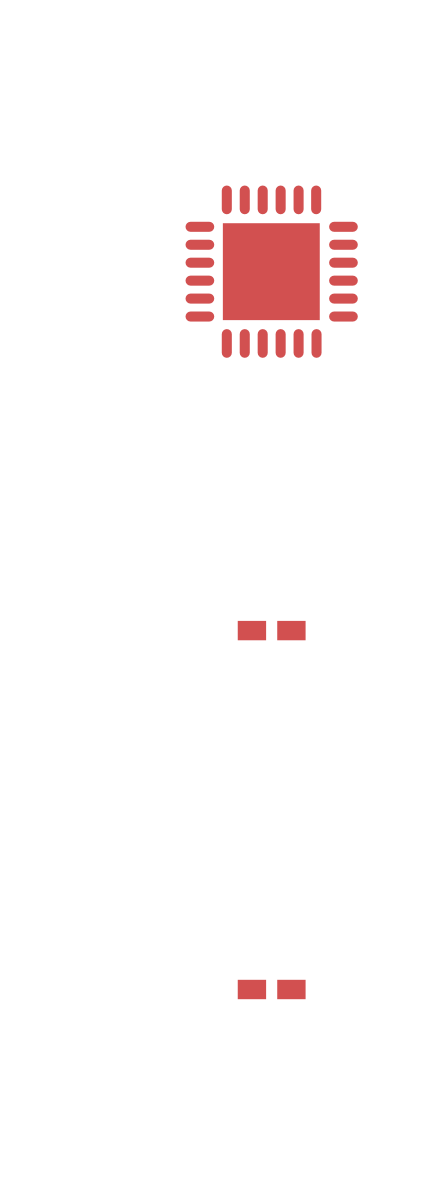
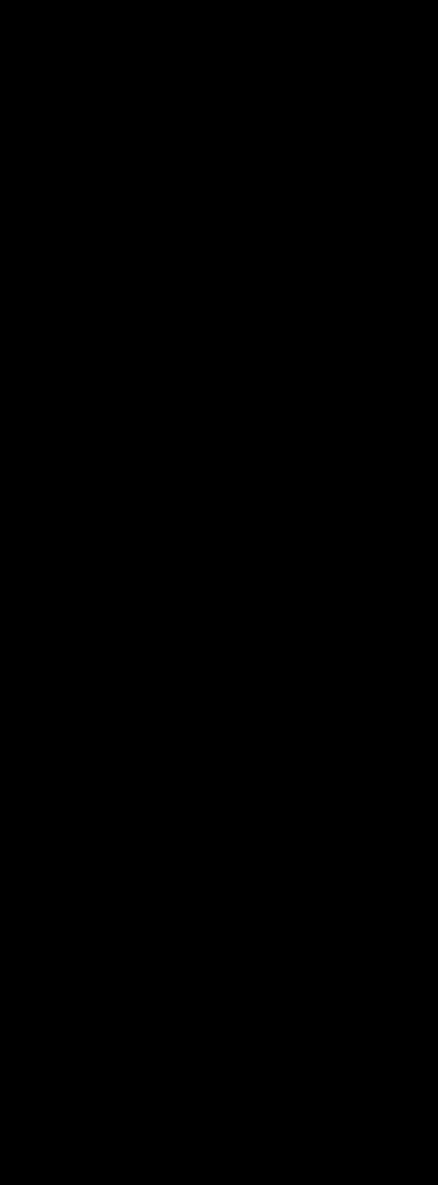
part: (271, 271) -> none
part: (271, 630) -> none
part: (271, 989) -> none

